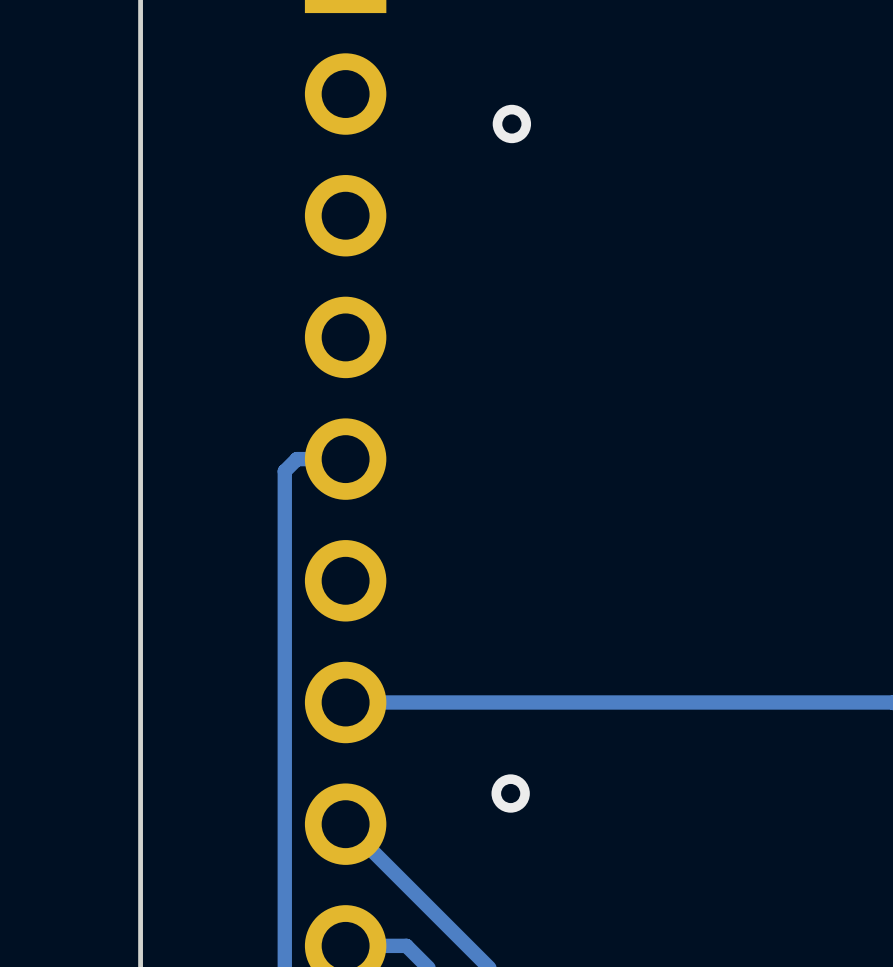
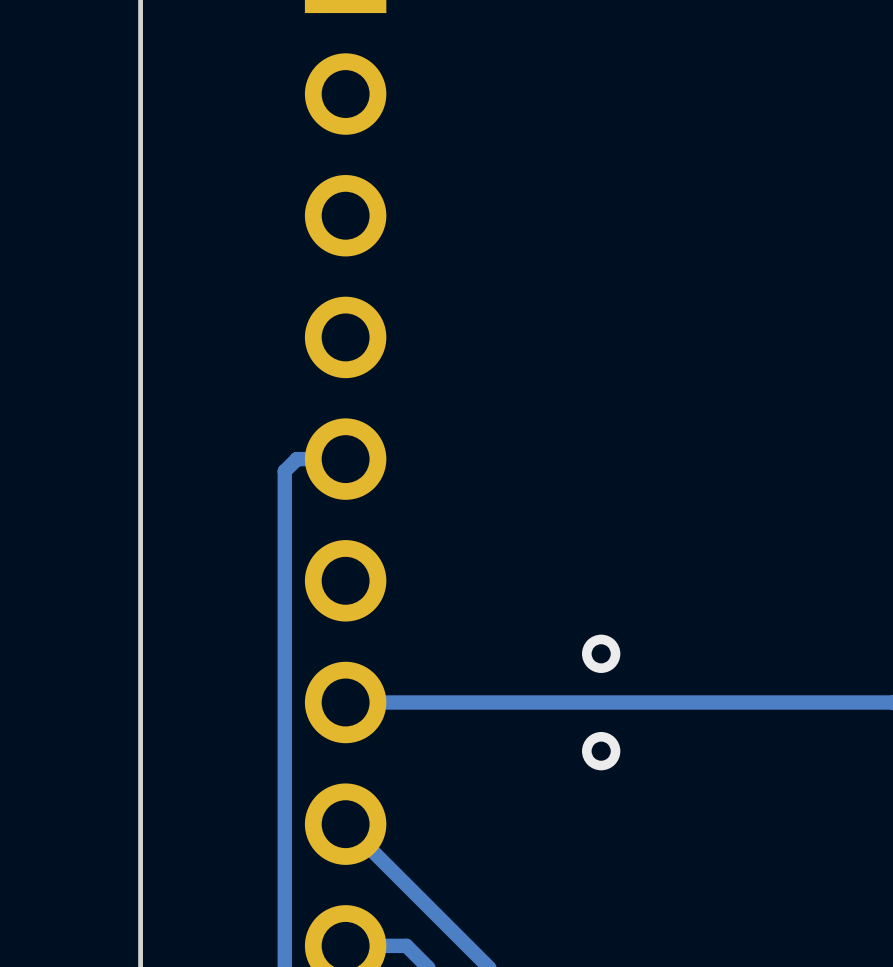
via: (511, 123) -> none
via: none -> (601, 653)
via: none -> (601, 751)
via: (510, 793) -> none

